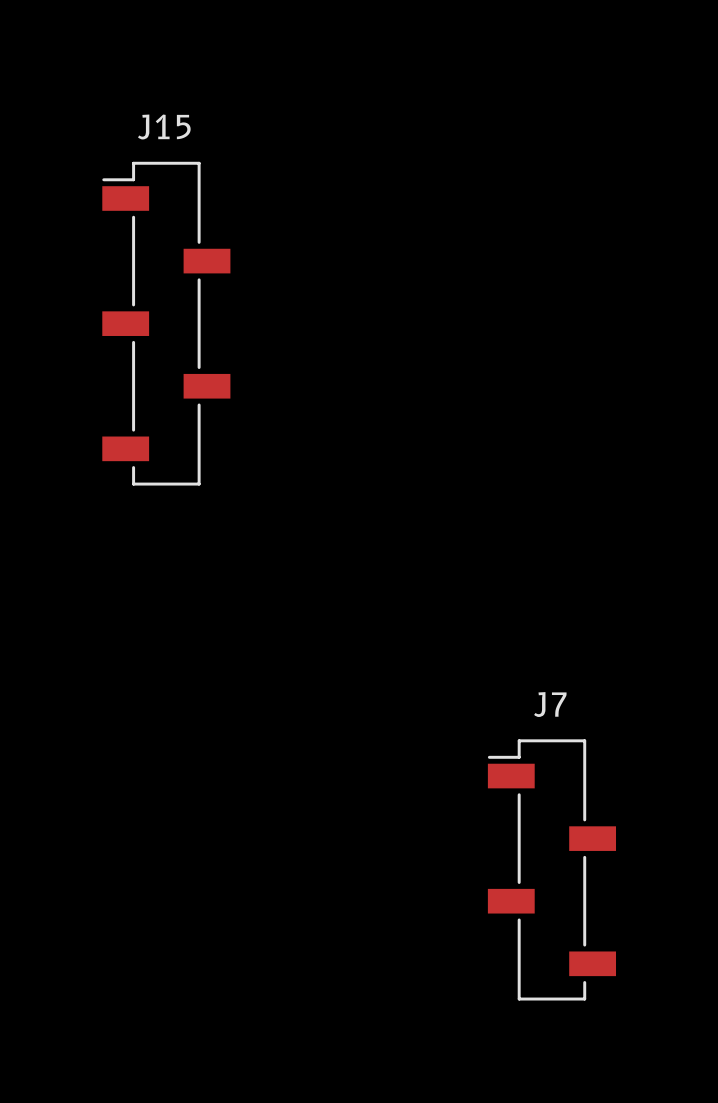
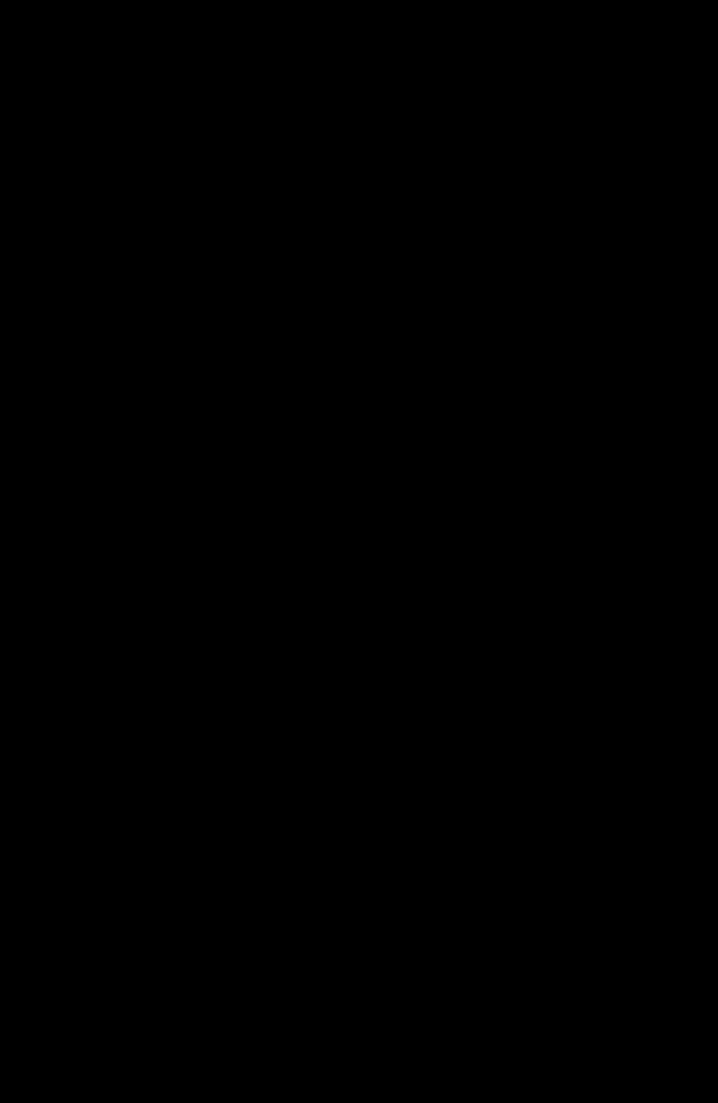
J15: (166, 323) -> none
J7: (551, 869) -> none

